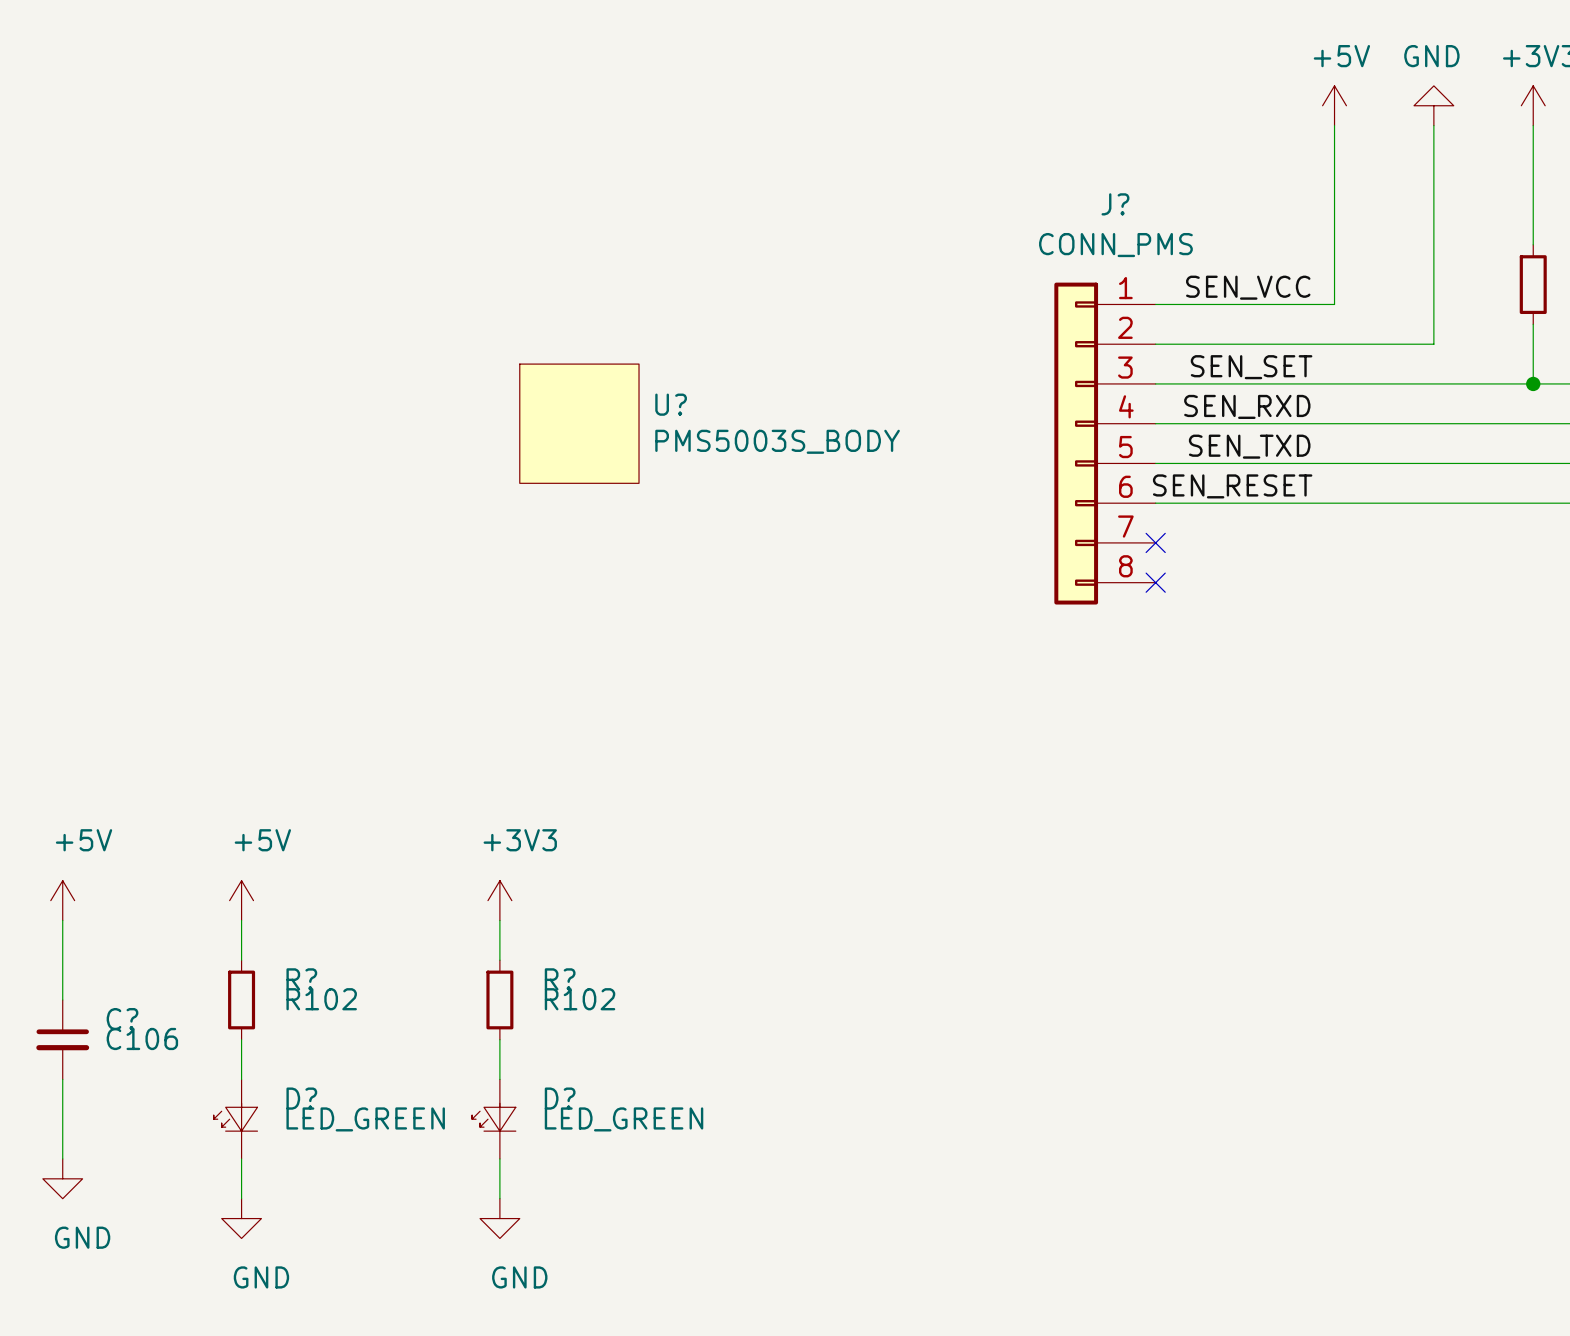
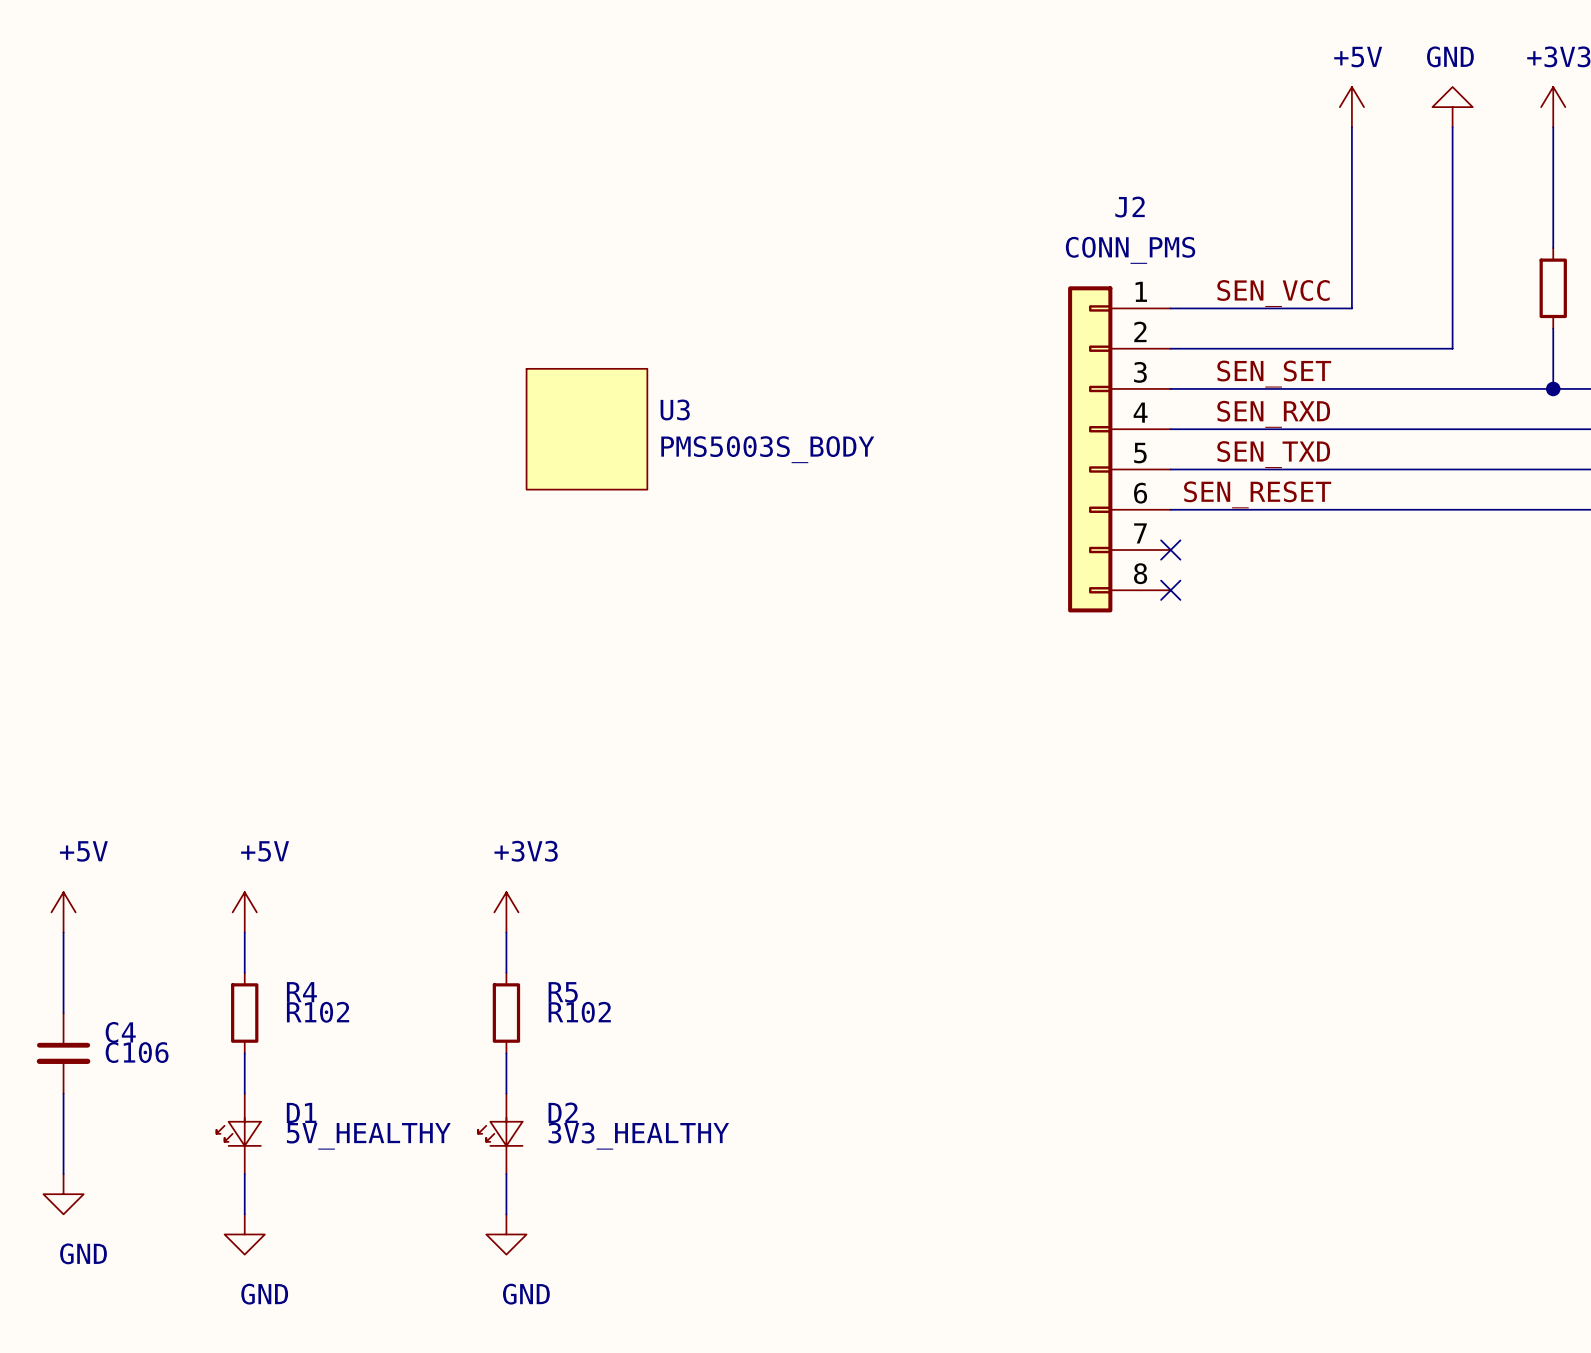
J? name: J? (1115, 204) -> J2 (1130, 207)
U? name: U? (671, 404) -> U3 (675, 409)
R? name: R? (301, 979) -> R4 (301, 992)
R? name: R? (560, 979) -> R5 (563, 992)
C? name: C? (122, 1019) -> C4 (120, 1032)
D? name: D? (301, 1098) -> D1 (301, 1112)
D? name: D? (560, 1098) -> D2 (563, 1112)
D? value: LED_GREEN (365, 1119) -> 5V_HEALTHY (368, 1136)
D? value: LED_GREEN (624, 1119) -> 3V3_HEALTHY (638, 1136)

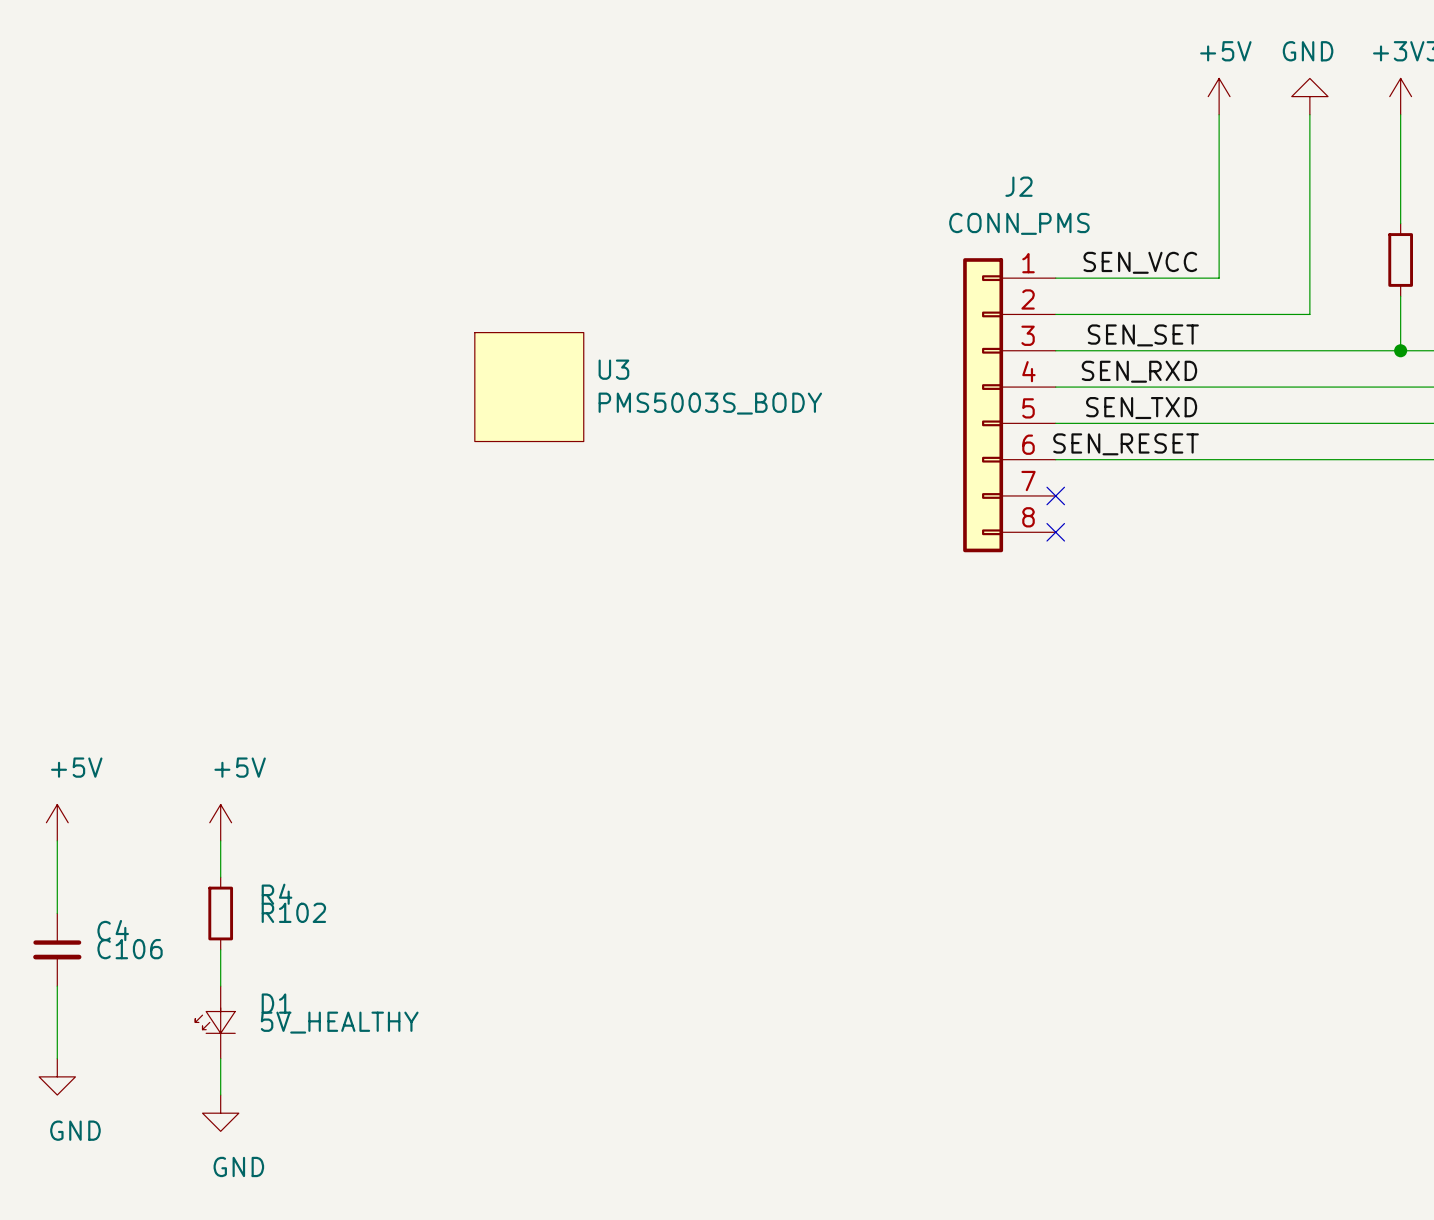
power symbol: +3V3 (506, 912) -> none
wire: (506, 932) (506, 972) -> none
R5: R102 (506, 1013) -> none
wire: (506, 1053) (506, 1093) -> none
D2: 3V3_HEALTHY (500, 1133) -> none
wire: (506, 1174) (506, 1214) -> none
power symbol: GND (506, 1234) -> none

